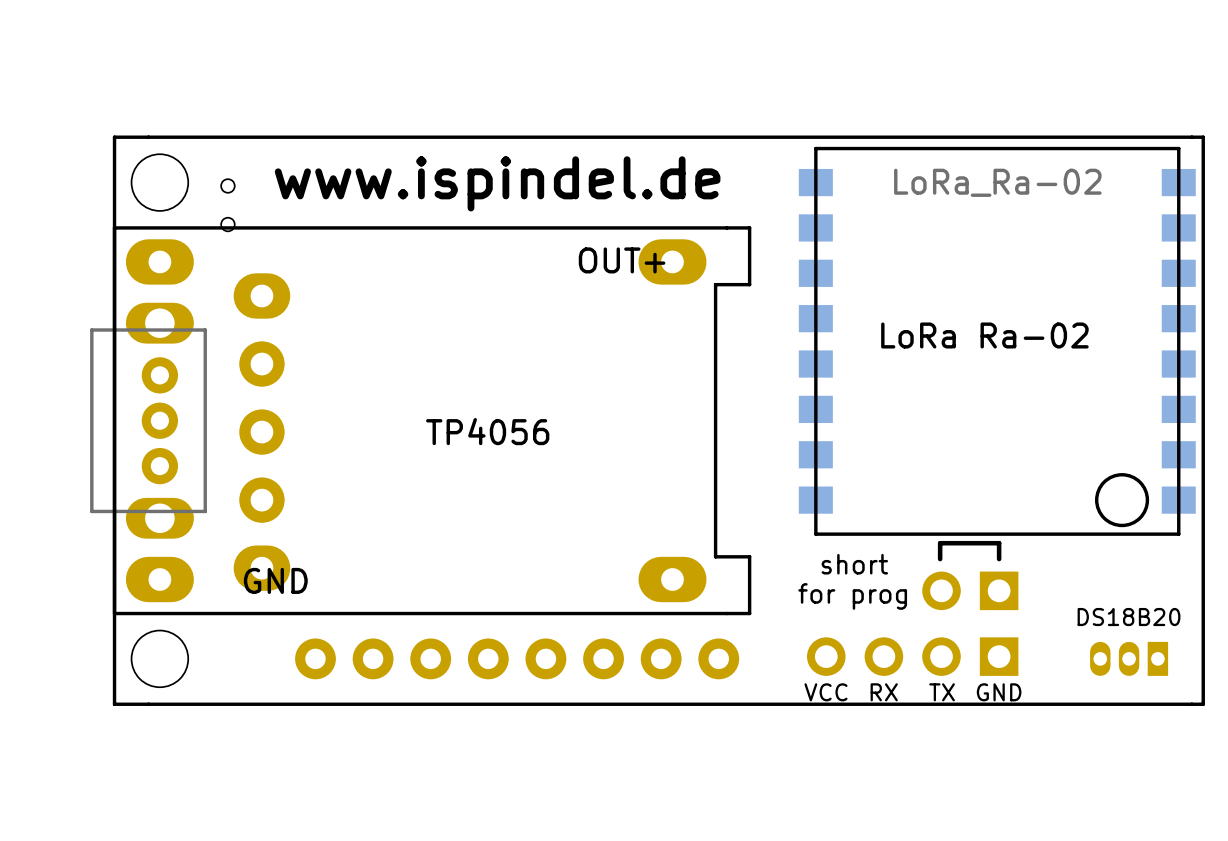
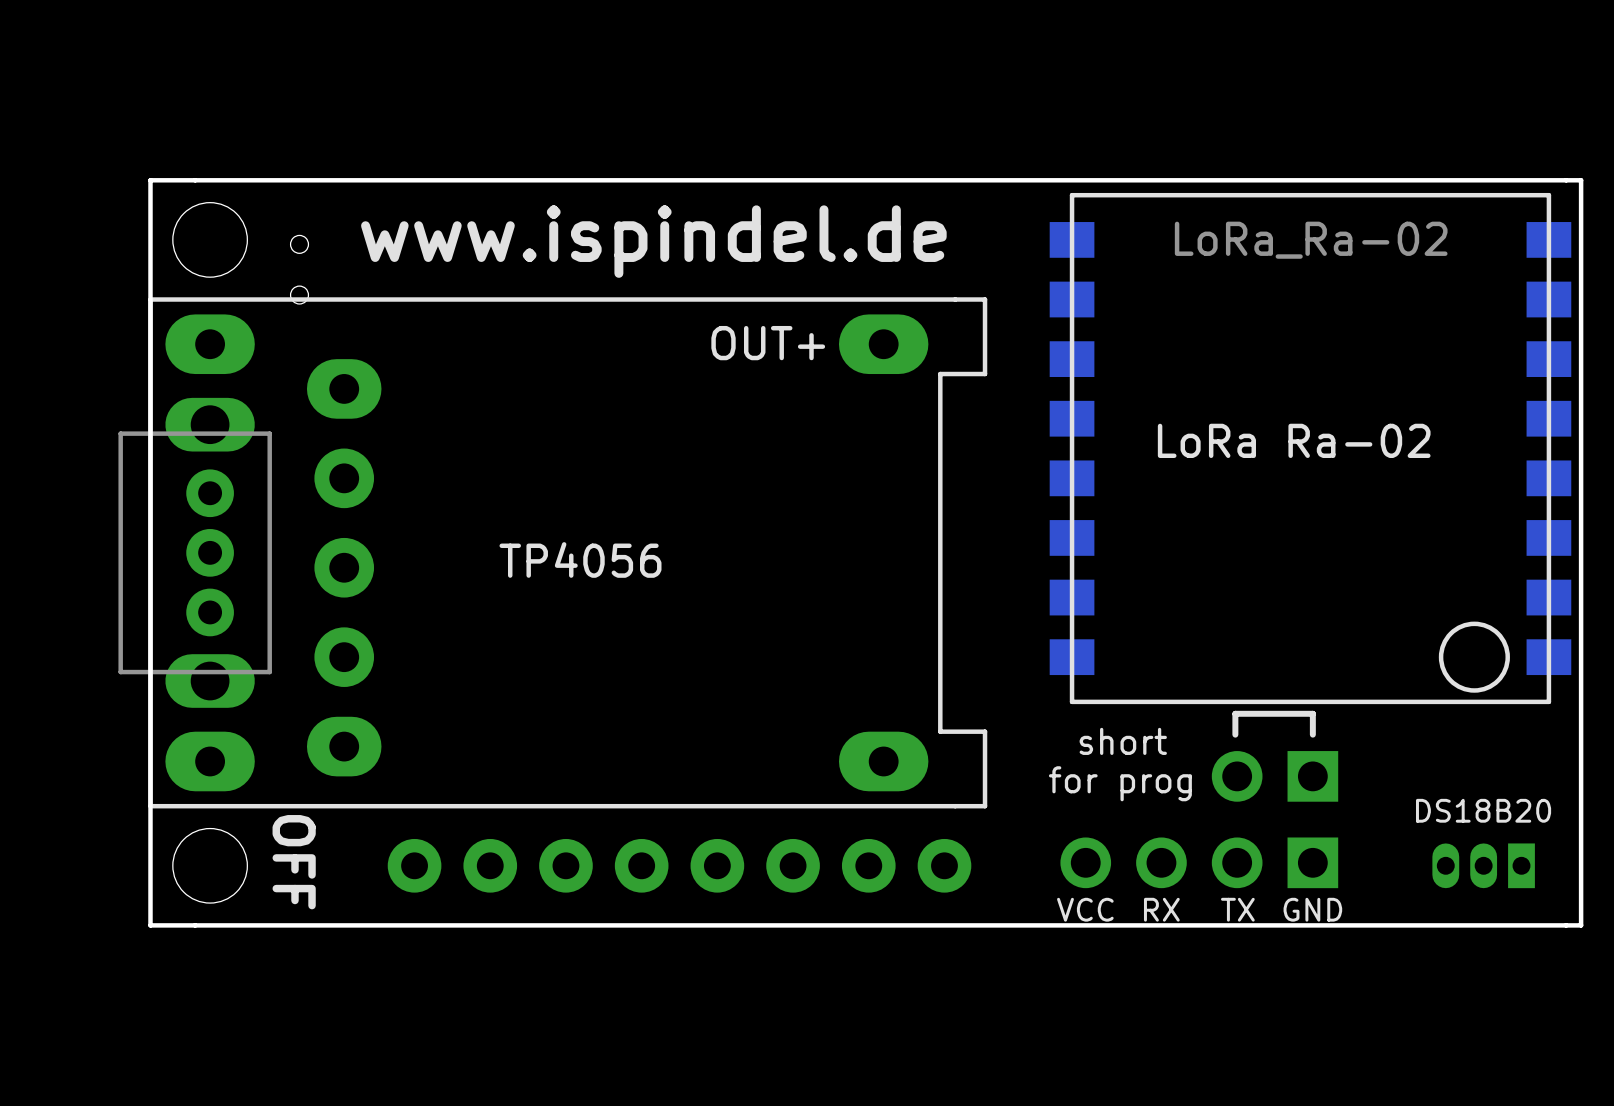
text position: OUT+ (622, 260) -> OUT+ (768, 343)
text position: TP4056 (487, 431) -> TP4056 (580, 559)
text: GND (275, 580) -> none
text: none -> OFF (294, 862)

